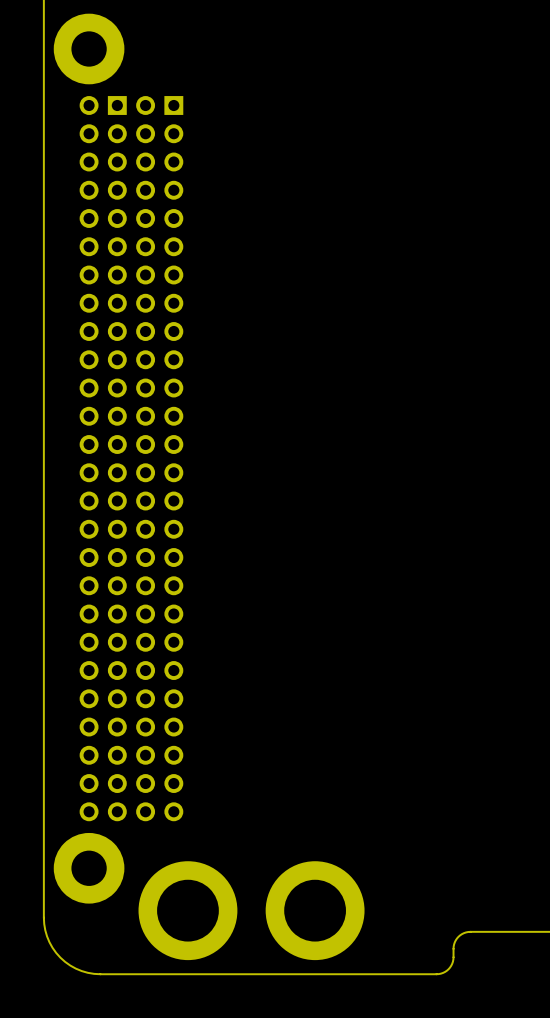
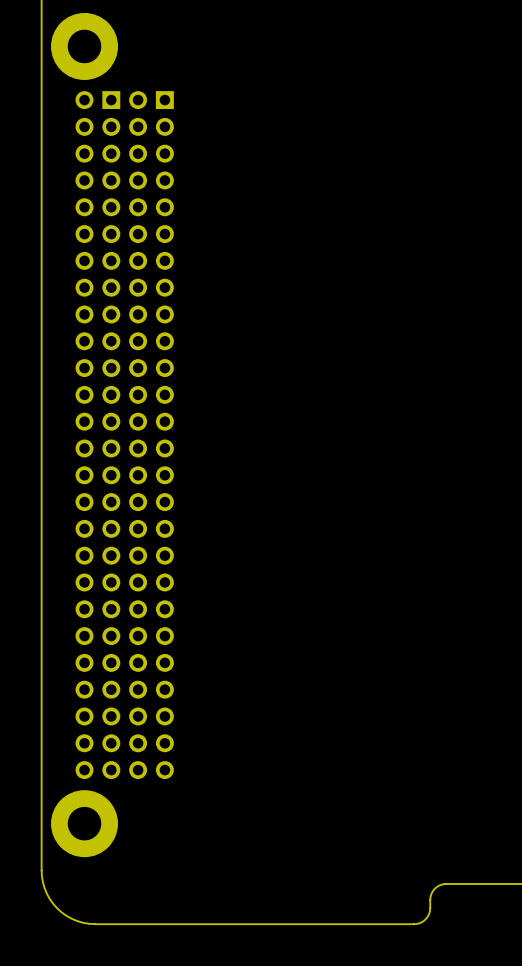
part: (187, 910) -> none
part: (315, 910) -> none

